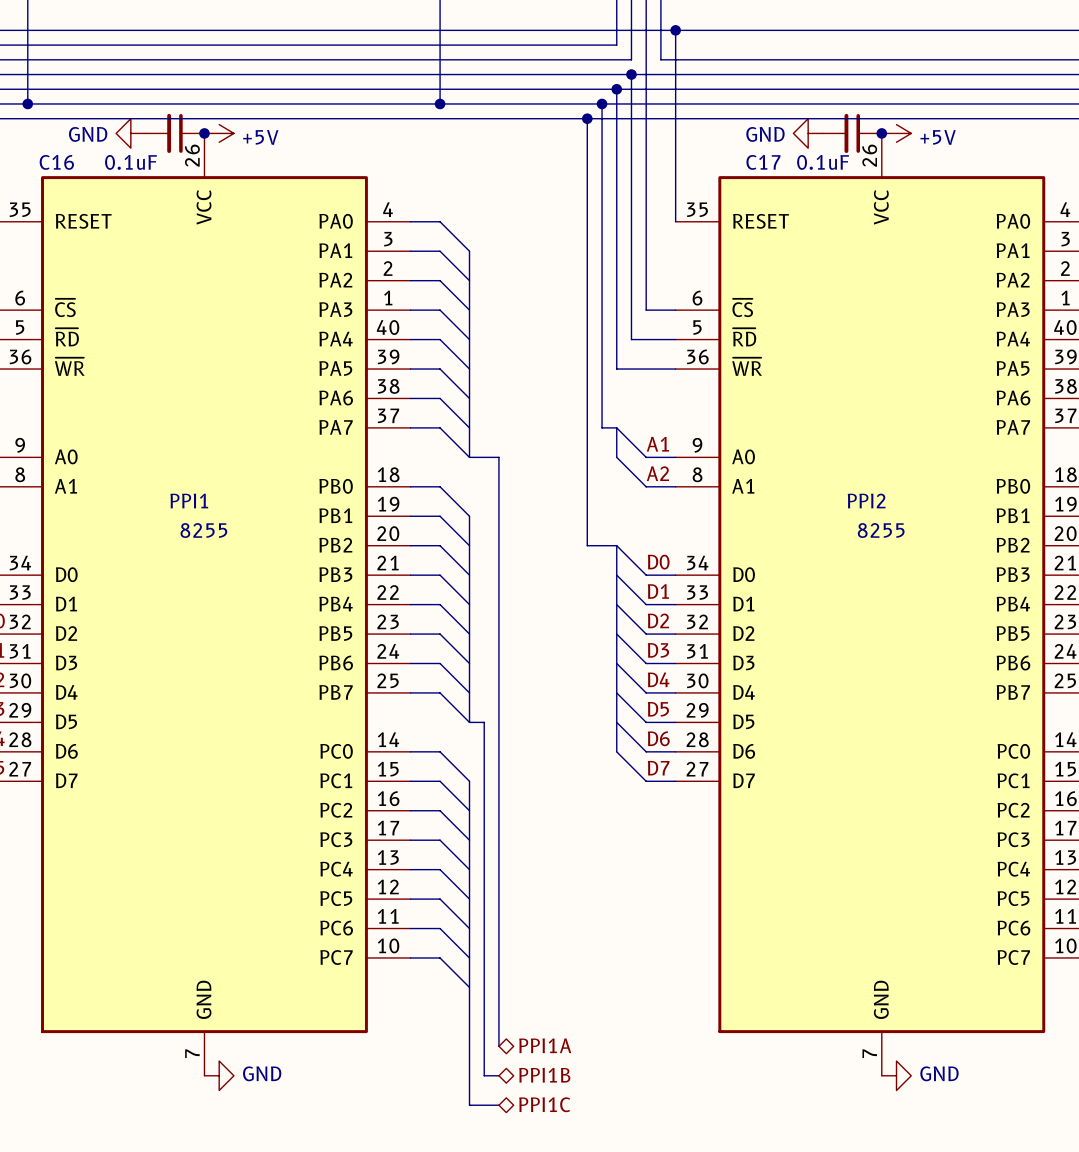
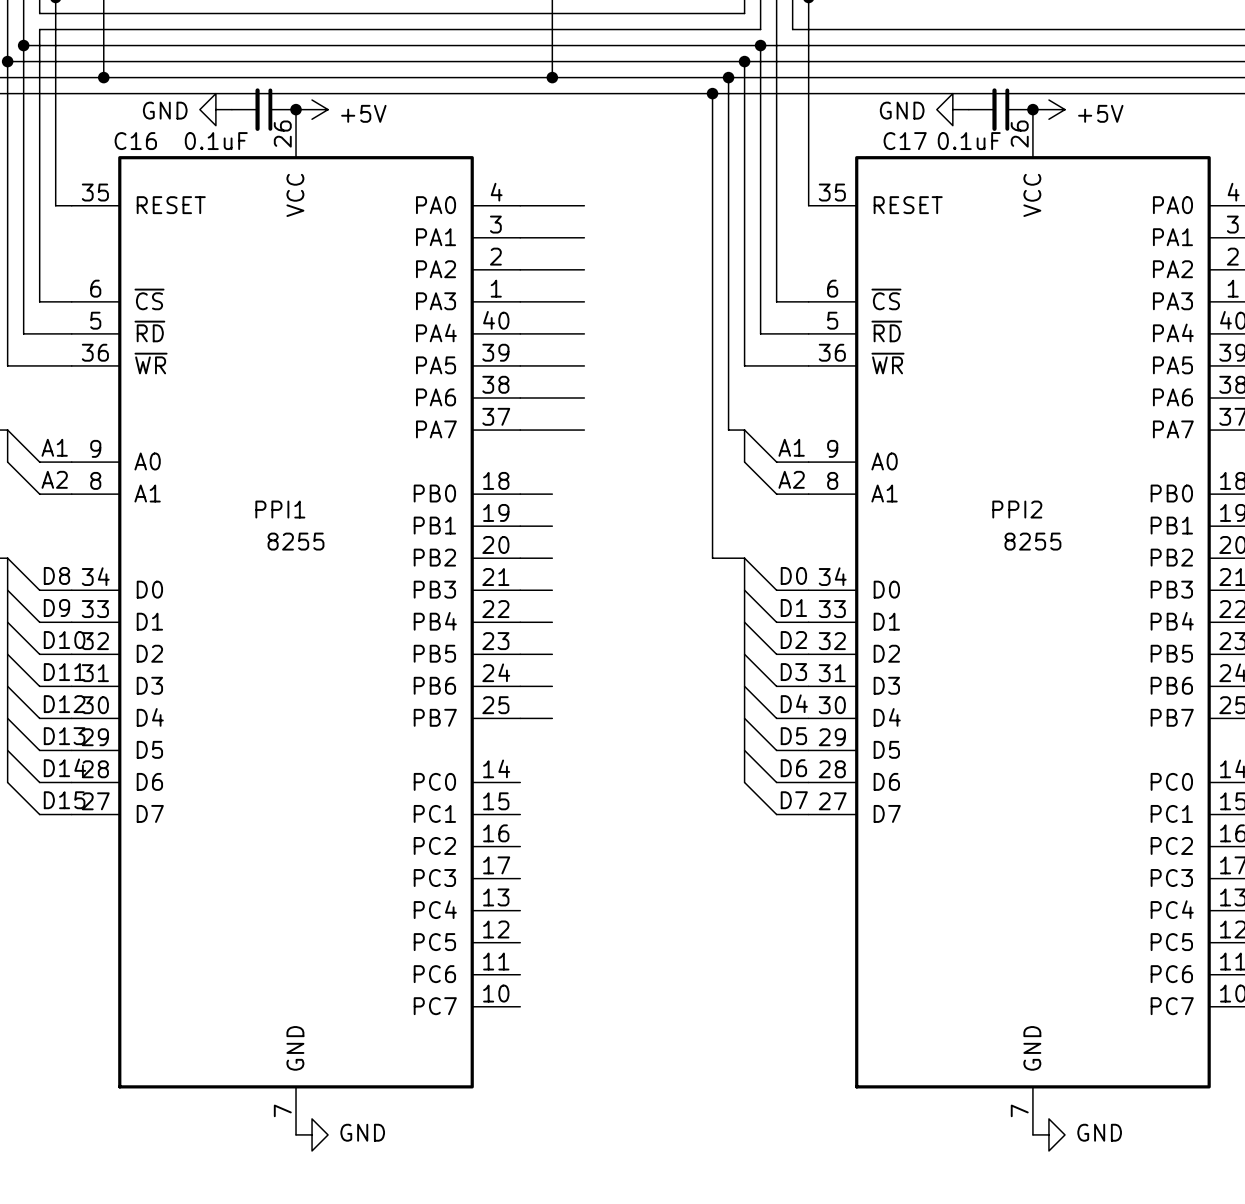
wire: (440, 221) (469, 251) -> (552, 205) (584, 205)
wire: (440, 251) (469, 280) -> (552, 237) (584, 237)
bus: (469, 251) (469, 457) (498, 457) (498, 1046) -> none
wire: (440, 280) (469, 310) -> (552, 269) (584, 269)
wire: (440, 310) (469, 339) -> (552, 301) (584, 301)
wire: (440, 339) (469, 369) -> (552, 333) (584, 333)
wire: (440, 369) (469, 398) -> (552, 365) (584, 365)
wire: (440, 398) (469, 427) -> (552, 398) (584, 398)
wire: (440, 427) (469, 457) -> (552, 430) (584, 430)
wire: (440, 486) (469, 516) -> none
wire: (440, 516) (469, 545) -> none
bus: (469, 516) (469, 722) (484, 722) (484, 1075) (498, 1075) -> none
wire: (440, 545) (469, 575) -> none
wire: (440, 575) (469, 604) -> none
wire: (440, 604) (469, 634) -> none
wire: (440, 634) (469, 663) -> none
wire: (440, 663) (469, 692) -> none
wire: (440, 692) (469, 722) -> none
wire: (410, 751) (440, 751) (469, 781) -> none
wire: (410, 781) (440, 781) (469, 810) -> none
bus: (469, 781) (469, 1105) (498, 1105) -> none
wire: (410, 810) (440, 810) (469, 840) -> none
wire: (410, 840) (440, 840) (469, 869) -> none
wire: (410, 869) (440, 869) (469, 899) -> none
wire: (410, 899) (440, 899) (469, 928) -> none
wire: (410, 928) (440, 928) (469, 957) -> none
wire: (410, 957) (440, 957) (469, 987) -> none
hierarchical label: PPI1A (545, 1045) -> none
hierarchical label: PPI1B (544, 1075) -> none
hierarchical label: PPI1C (544, 1104) -> none

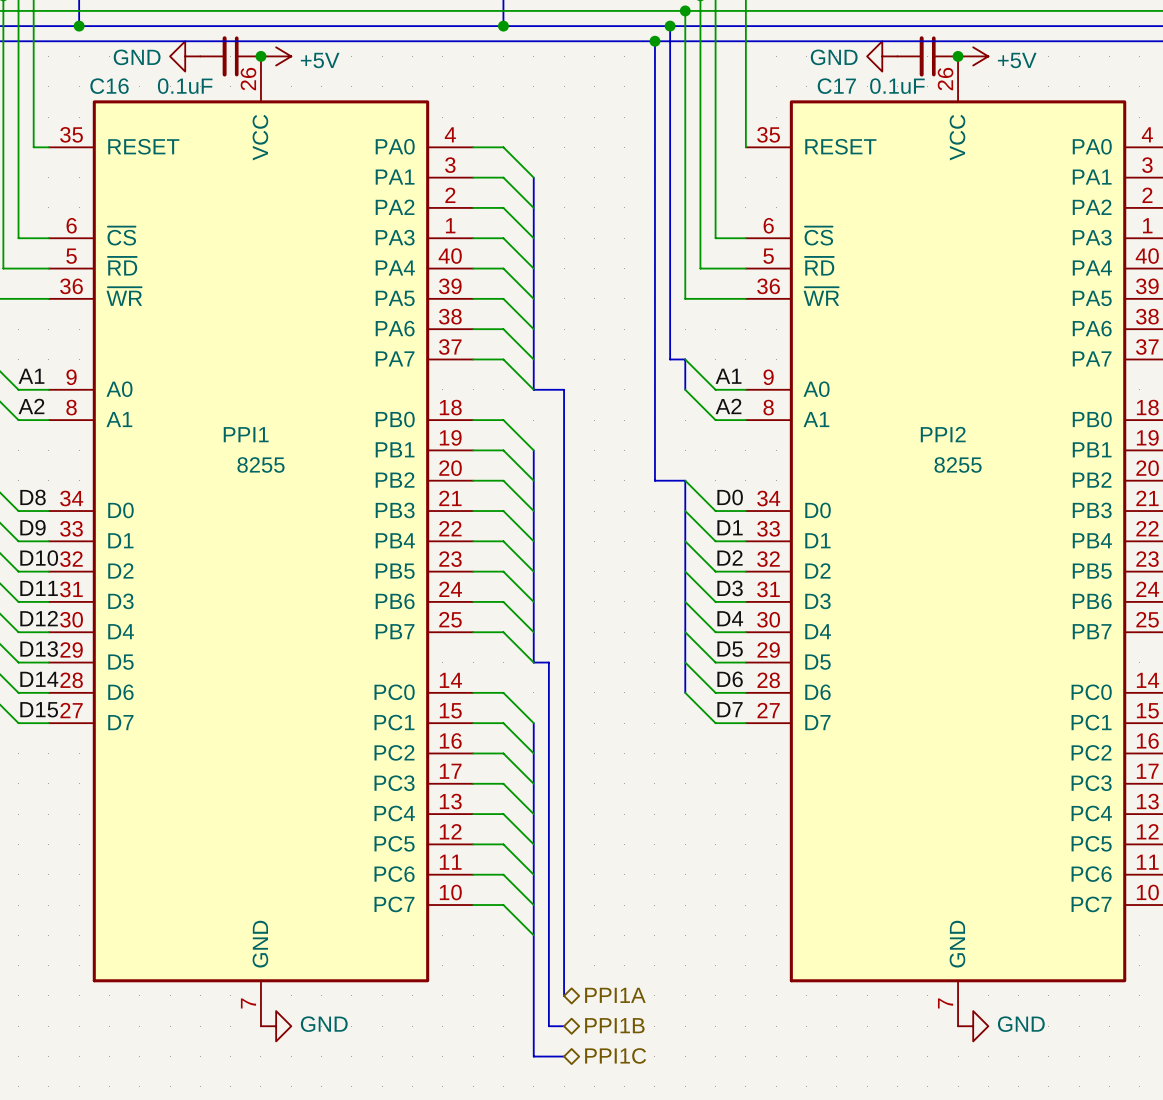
wire: (552, 205) (584, 205) -> (503, 147) (533, 177)
wire: (552, 237) (584, 237) -> (503, 177) (533, 207)
bus: none -> (533, 177) (533, 389) (564, 389) (564, 995)
wire: (552, 269) (584, 269) -> (503, 207) (533, 238)
wire: (552, 301) (584, 301) -> (503, 238) (533, 268)
wire: (552, 333) (584, 333) -> (503, 268) (533, 298)
wire: (552, 365) (584, 365) -> (503, 298) (533, 329)
wire: (552, 398) (584, 398) -> (503, 329) (533, 359)
wire: (552, 430) (584, 430) -> (503, 359) (533, 389)
wire: none -> (503, 420) (533, 450)
wire: none -> (503, 450) (533, 480)
bus: none -> (533, 450) (533, 662) (548, 662) (548, 1026) (564, 1026)
wire: none -> (503, 480) (533, 511)
wire: none -> (503, 511) (533, 541)
wire: none -> (503, 541) (533, 571)
wire: none -> (503, 571) (533, 601)
wire: none -> (503, 601) (533, 632)
wire: none -> (503, 632) (533, 662)
wire: none -> (473, 692) (503, 692) (533, 723)
wire: none -> (473, 723) (503, 723) (533, 753)
bus: none -> (533, 723) (533, 1056) (564, 1056)
wire: none -> (473, 753) (503, 753) (533, 783)
wire: none -> (473, 783) (503, 783) (533, 814)
wire: none -> (473, 814) (503, 814) (533, 844)
wire: none -> (473, 844) (503, 844) (533, 874)
wire: none -> (473, 874) (503, 874) (533, 905)
wire: none -> (473, 905) (503, 905) (533, 935)
hierarchical label: none -> PPI1A (615, 995)
hierarchical label: none -> PPI1B (614, 1025)
hierarchical label: none -> PPI1C (615, 1055)

